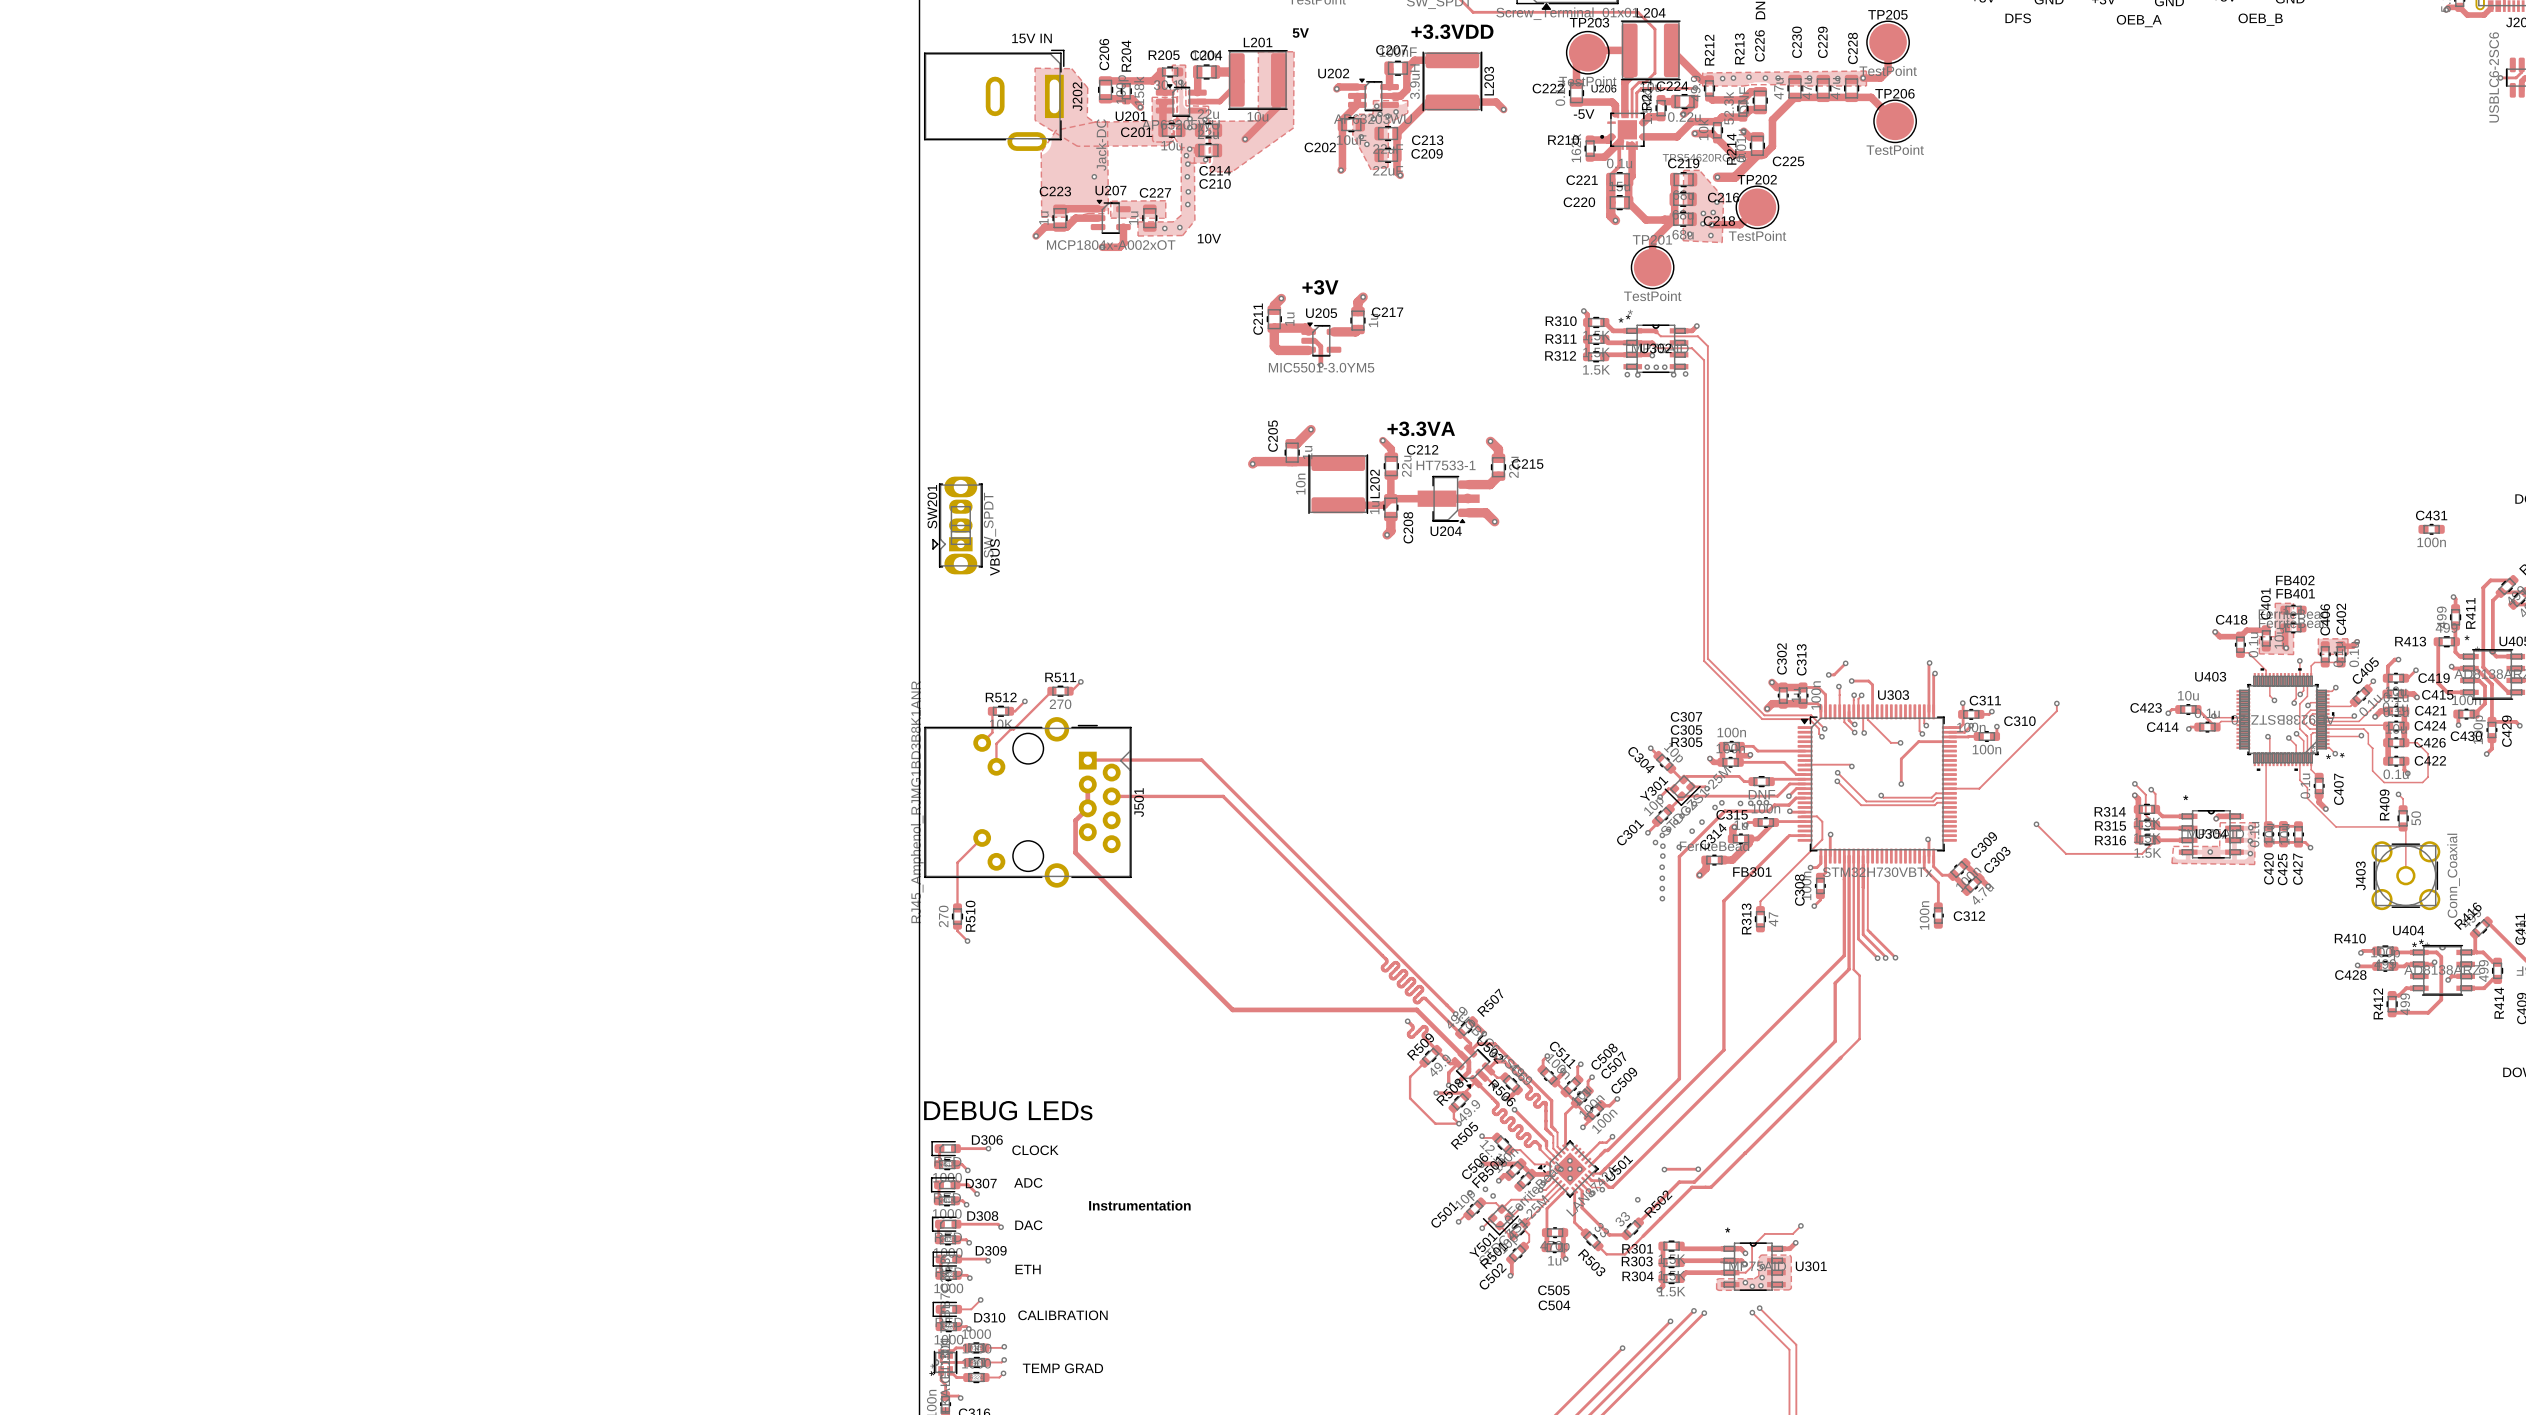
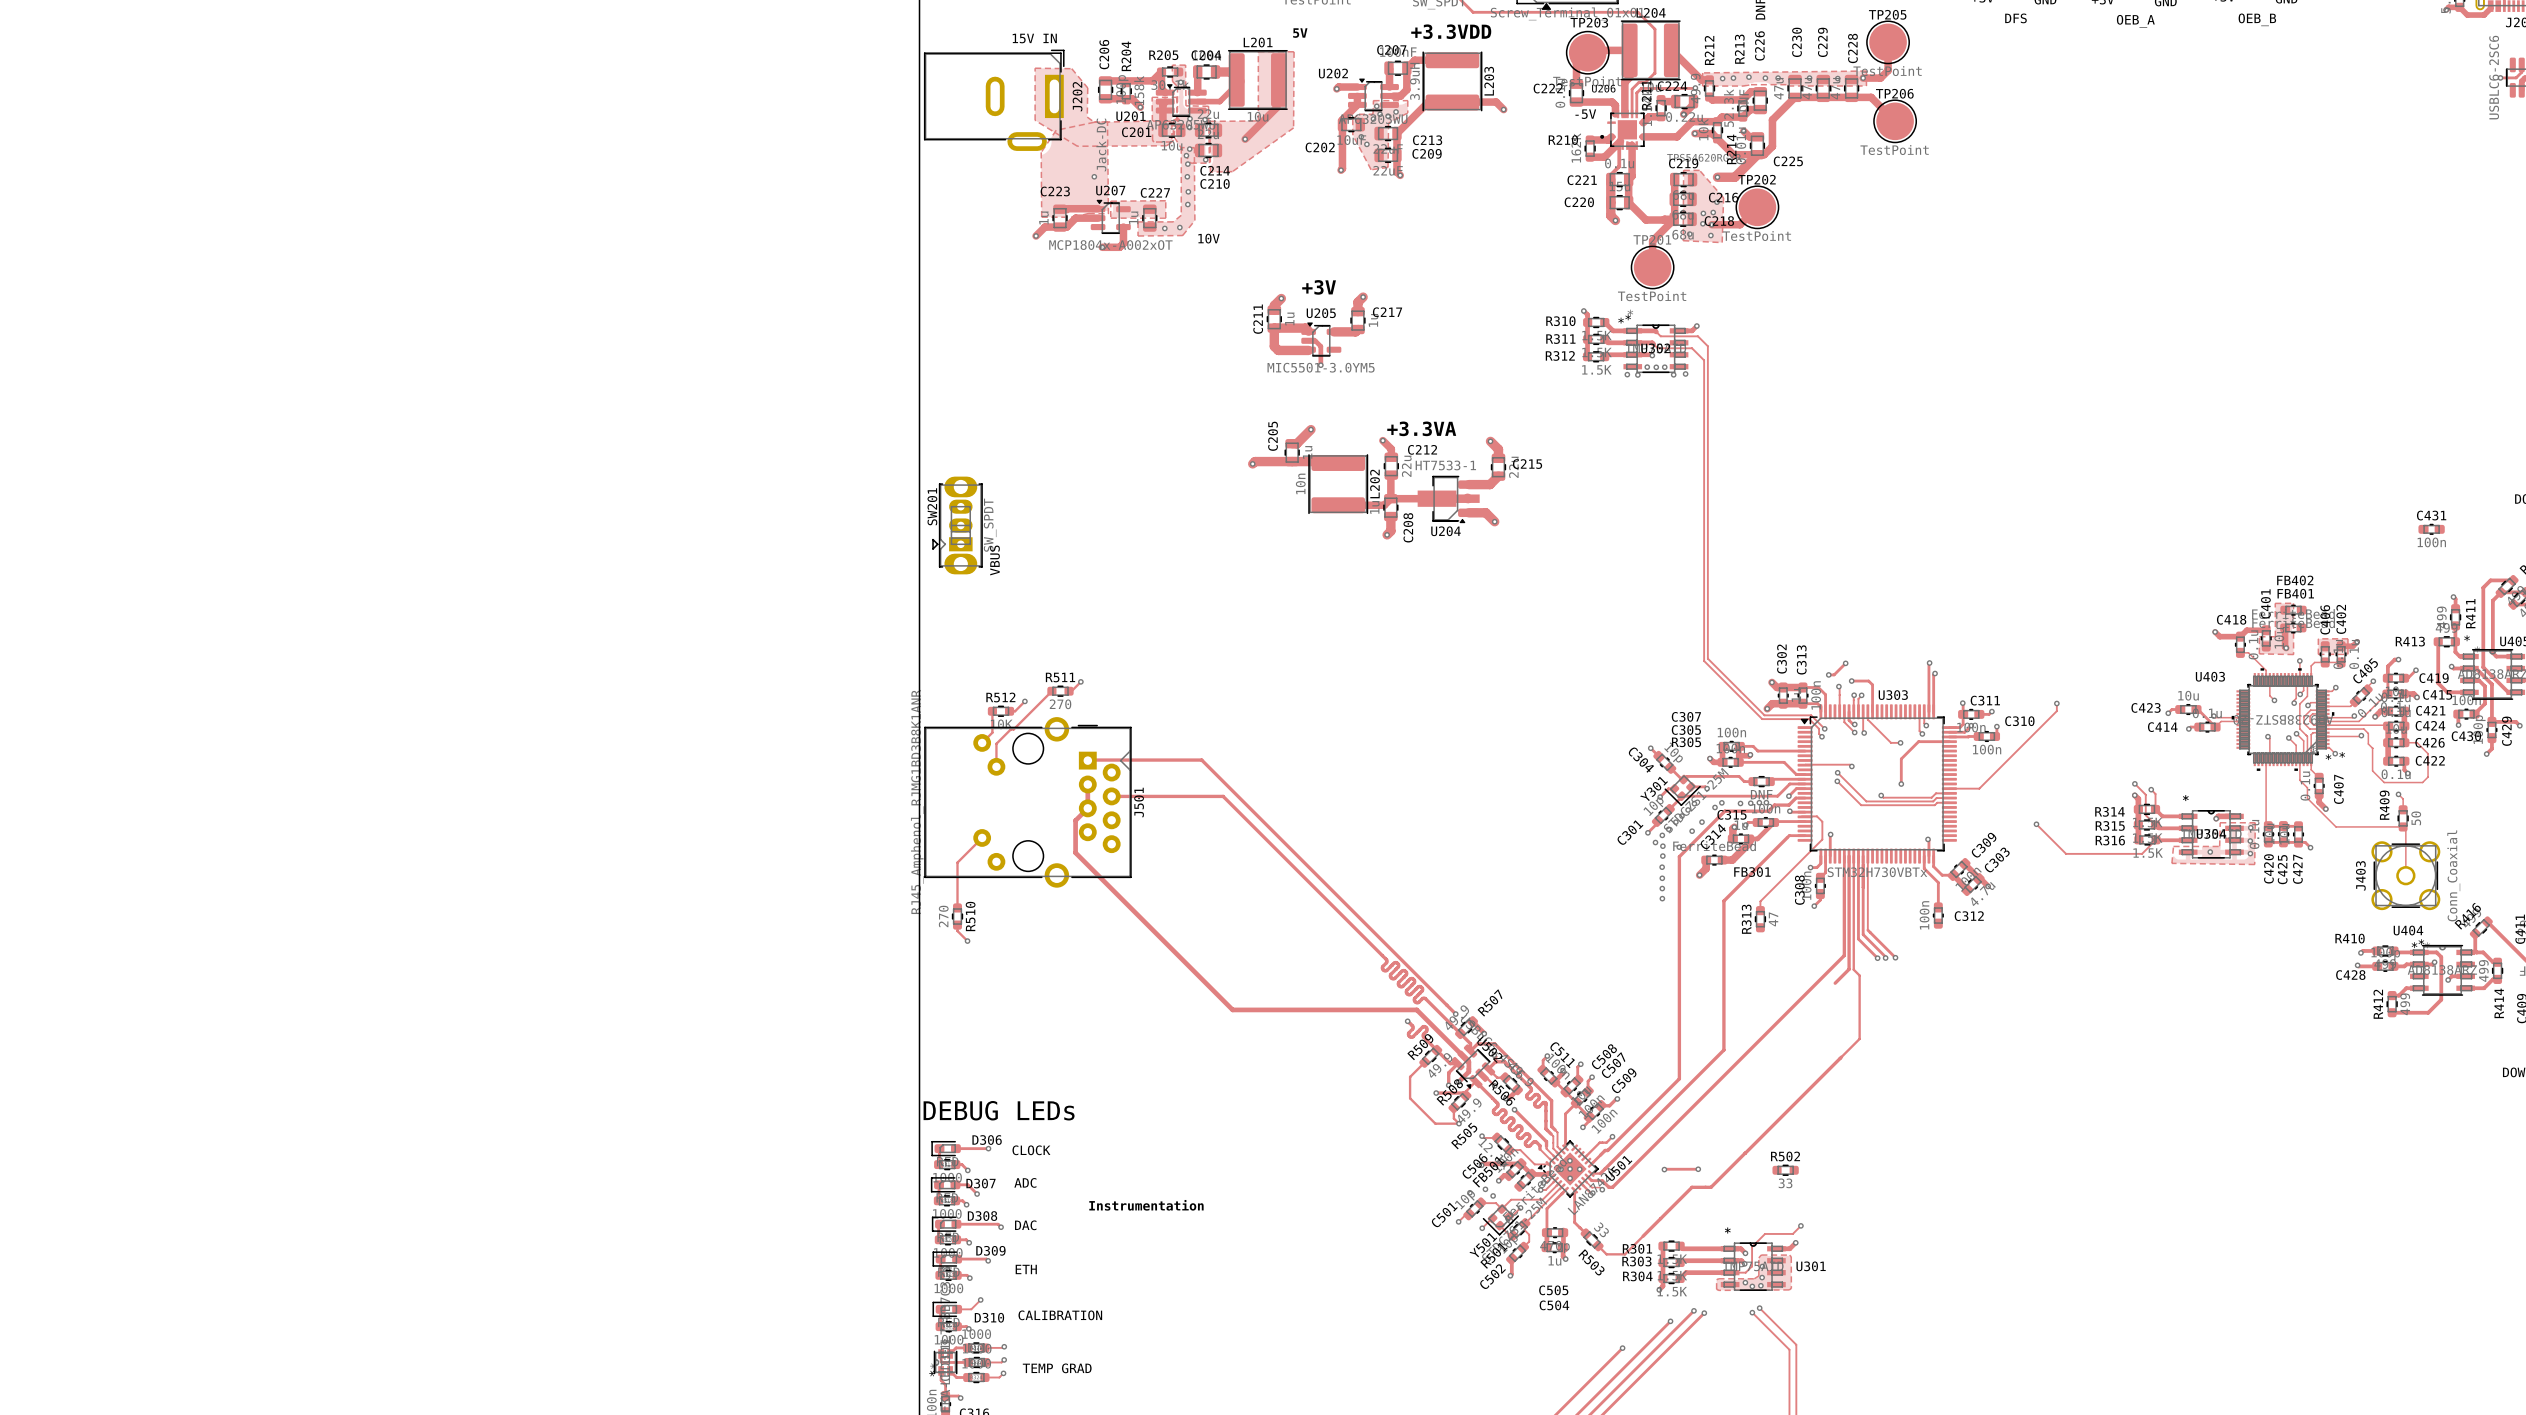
track: (1835, 983) (1835, 1041) (1694, 1182) (1679, 1182) (1638, 1222) -> none
track: (1577, 1186) (1582, 1191) (1582, 1207) (1609, 1234) (1626, 1234) -> none
via: (1637, 1199) -> none
R502 name position: R502 (1658, 1204) -> R502 (1785, 1156)
R502 value position: 33 (1622, 1219) -> 33 (1785, 1183)
R502 rotation: 0° (1632, 1228) -> 45° clockwise (1785, 1170)
R502 position: (1632, 1228) -> (1785, 1170)

